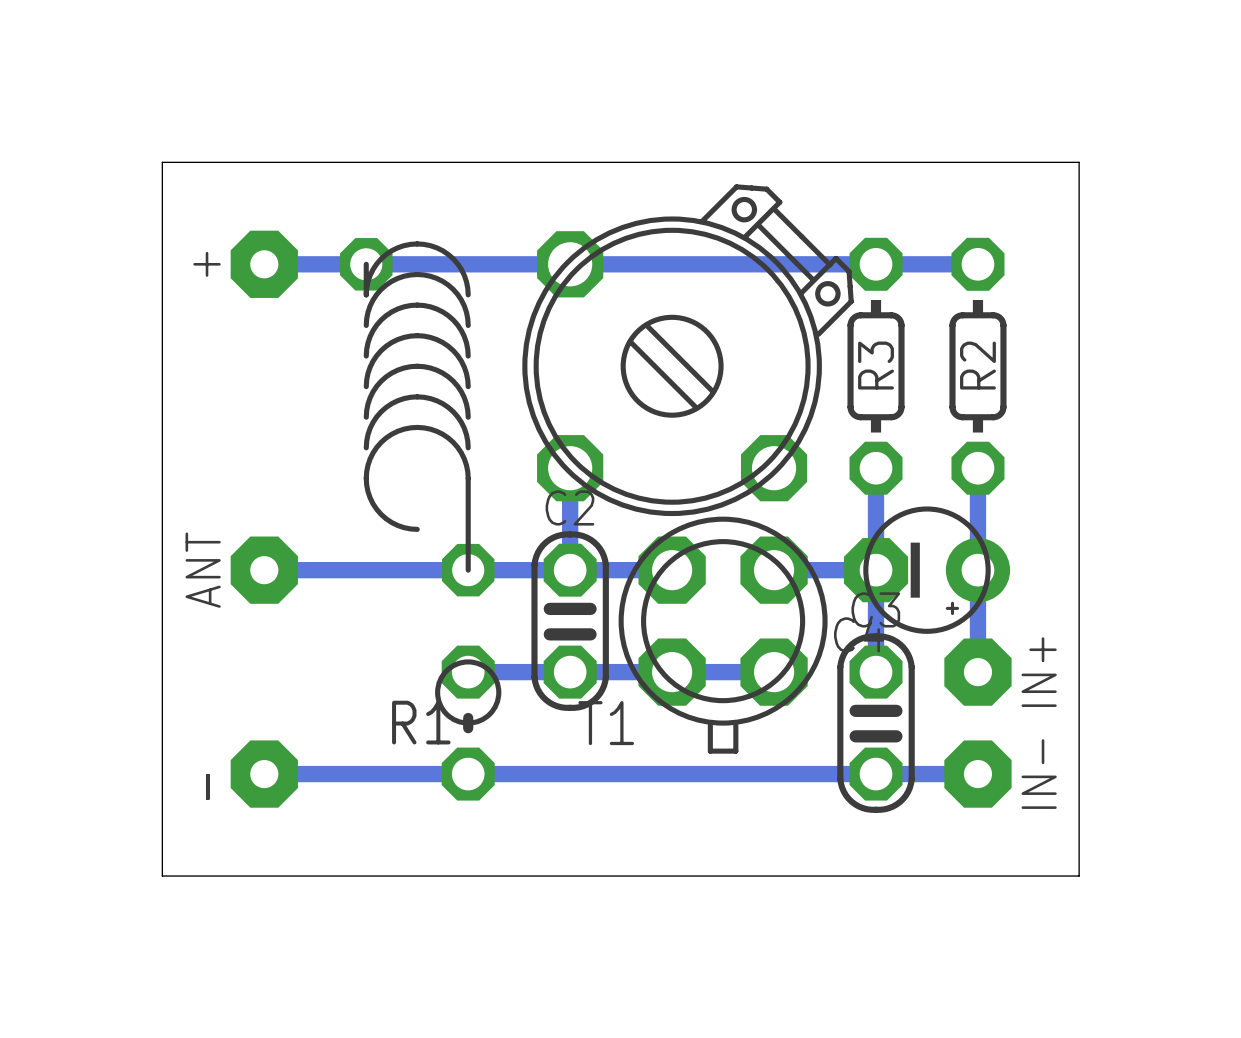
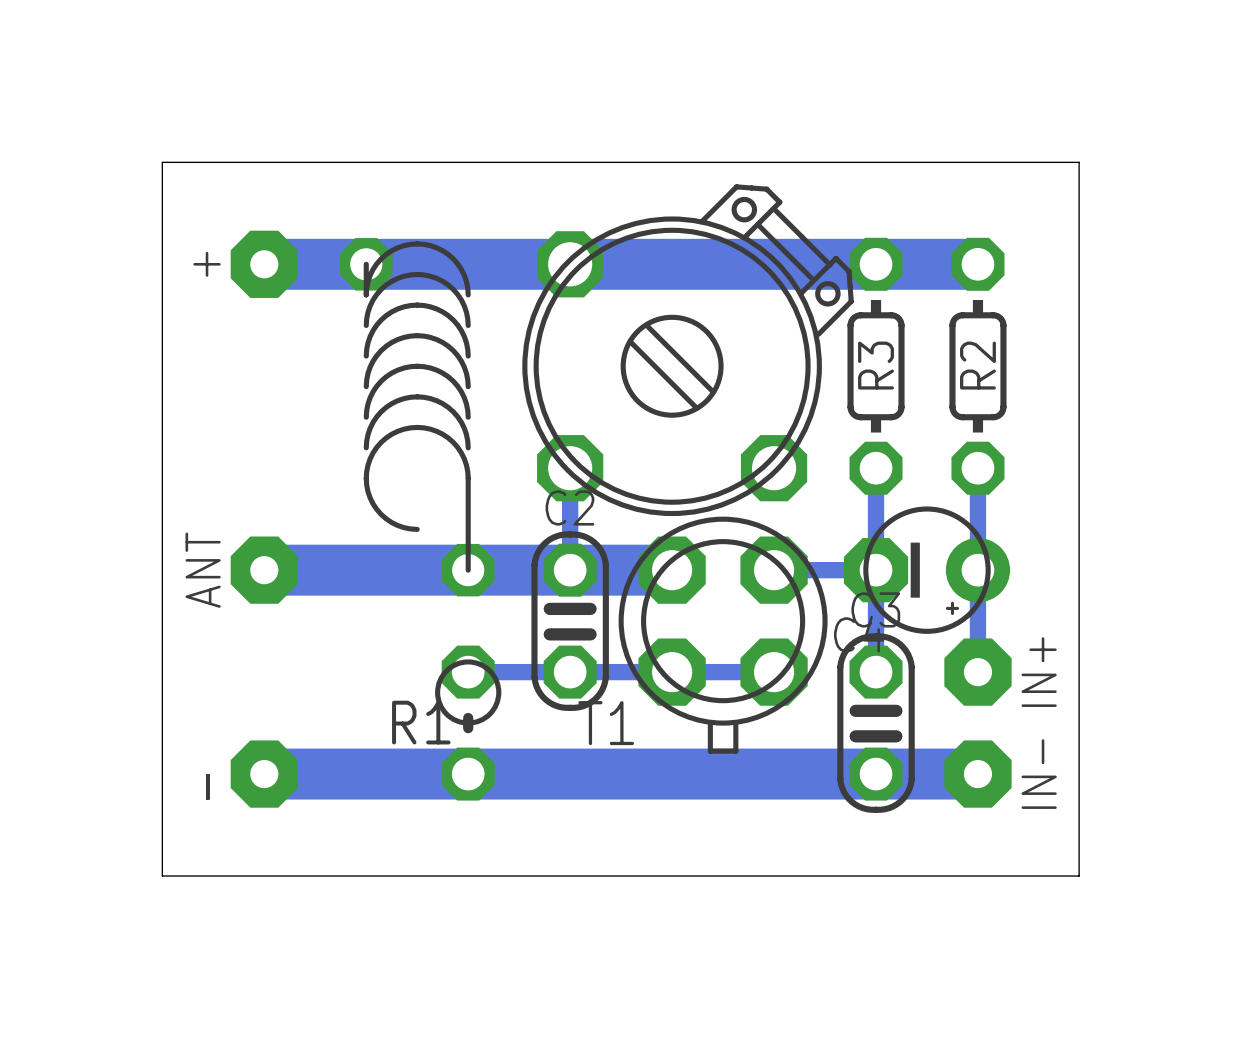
bottom track width: thin (264, 264) (977, 264) -> thick (264, 264) (977, 264)
bottom track width: thin (264, 570) (672, 570) -> thick (264, 570) (672, 570)
bottom track width: thin (264, 774) (977, 774) -> thick (264, 774) (977, 774)

